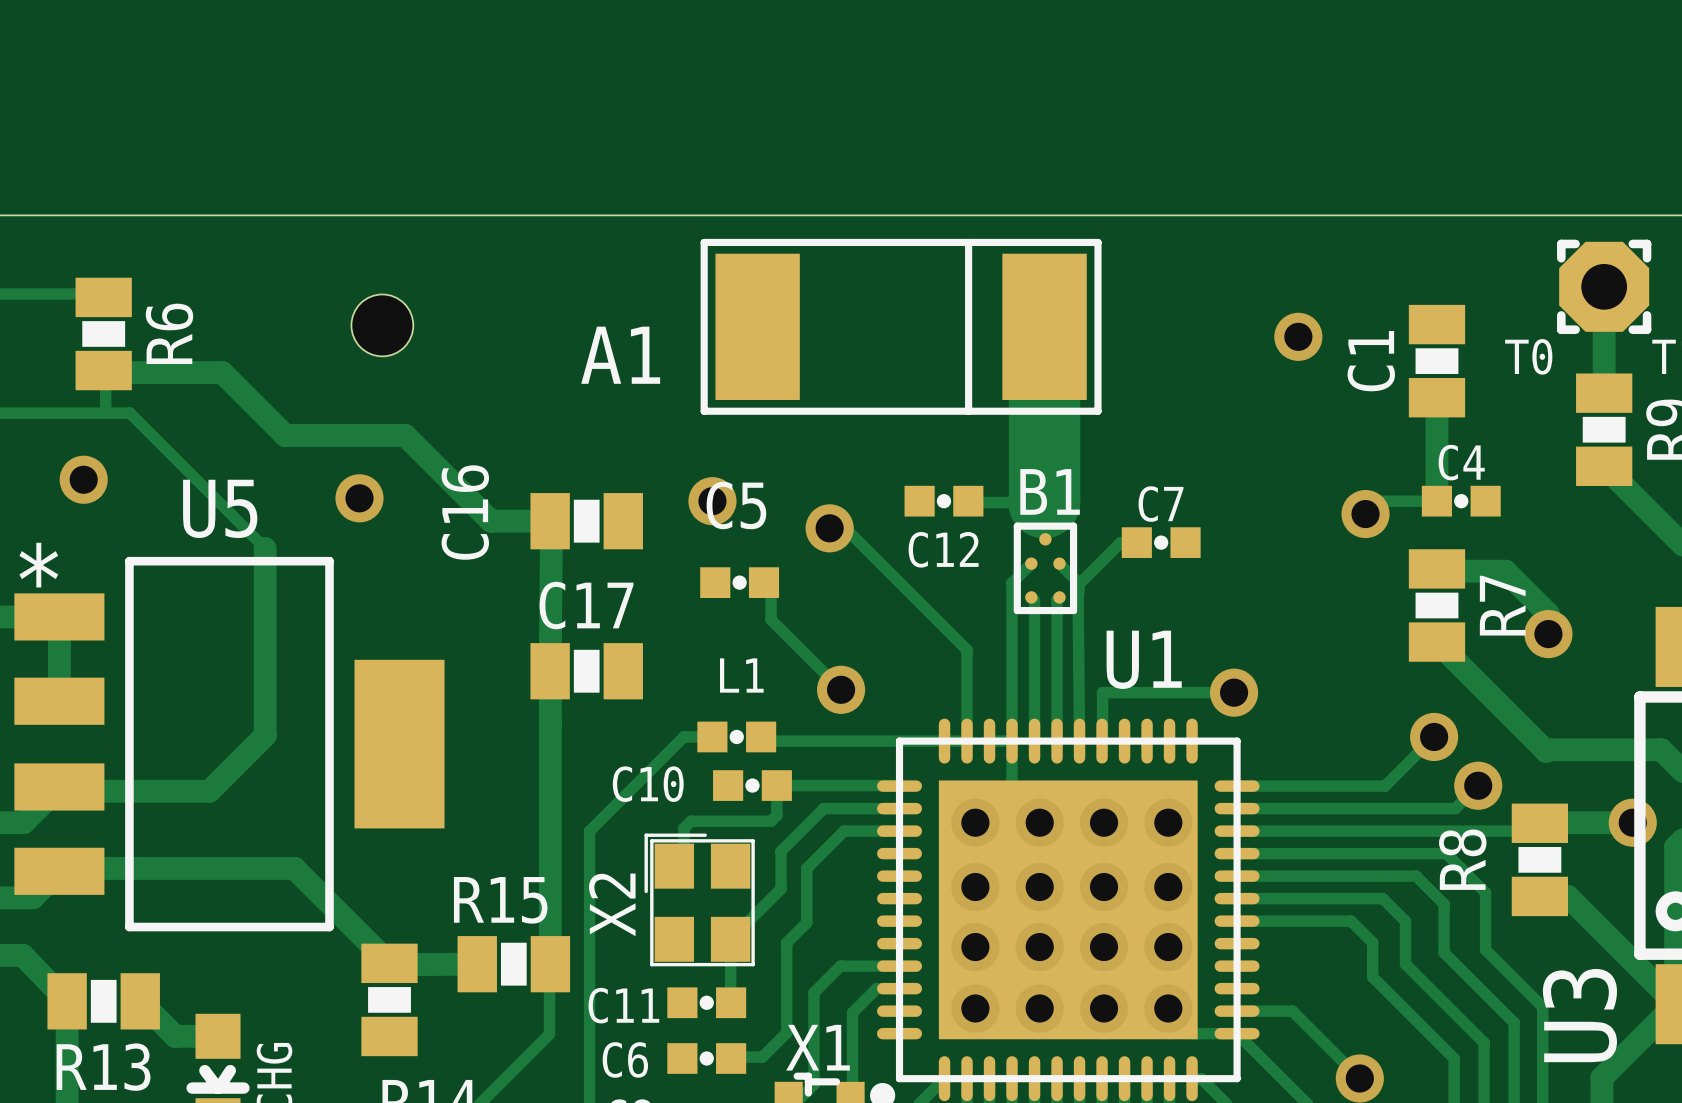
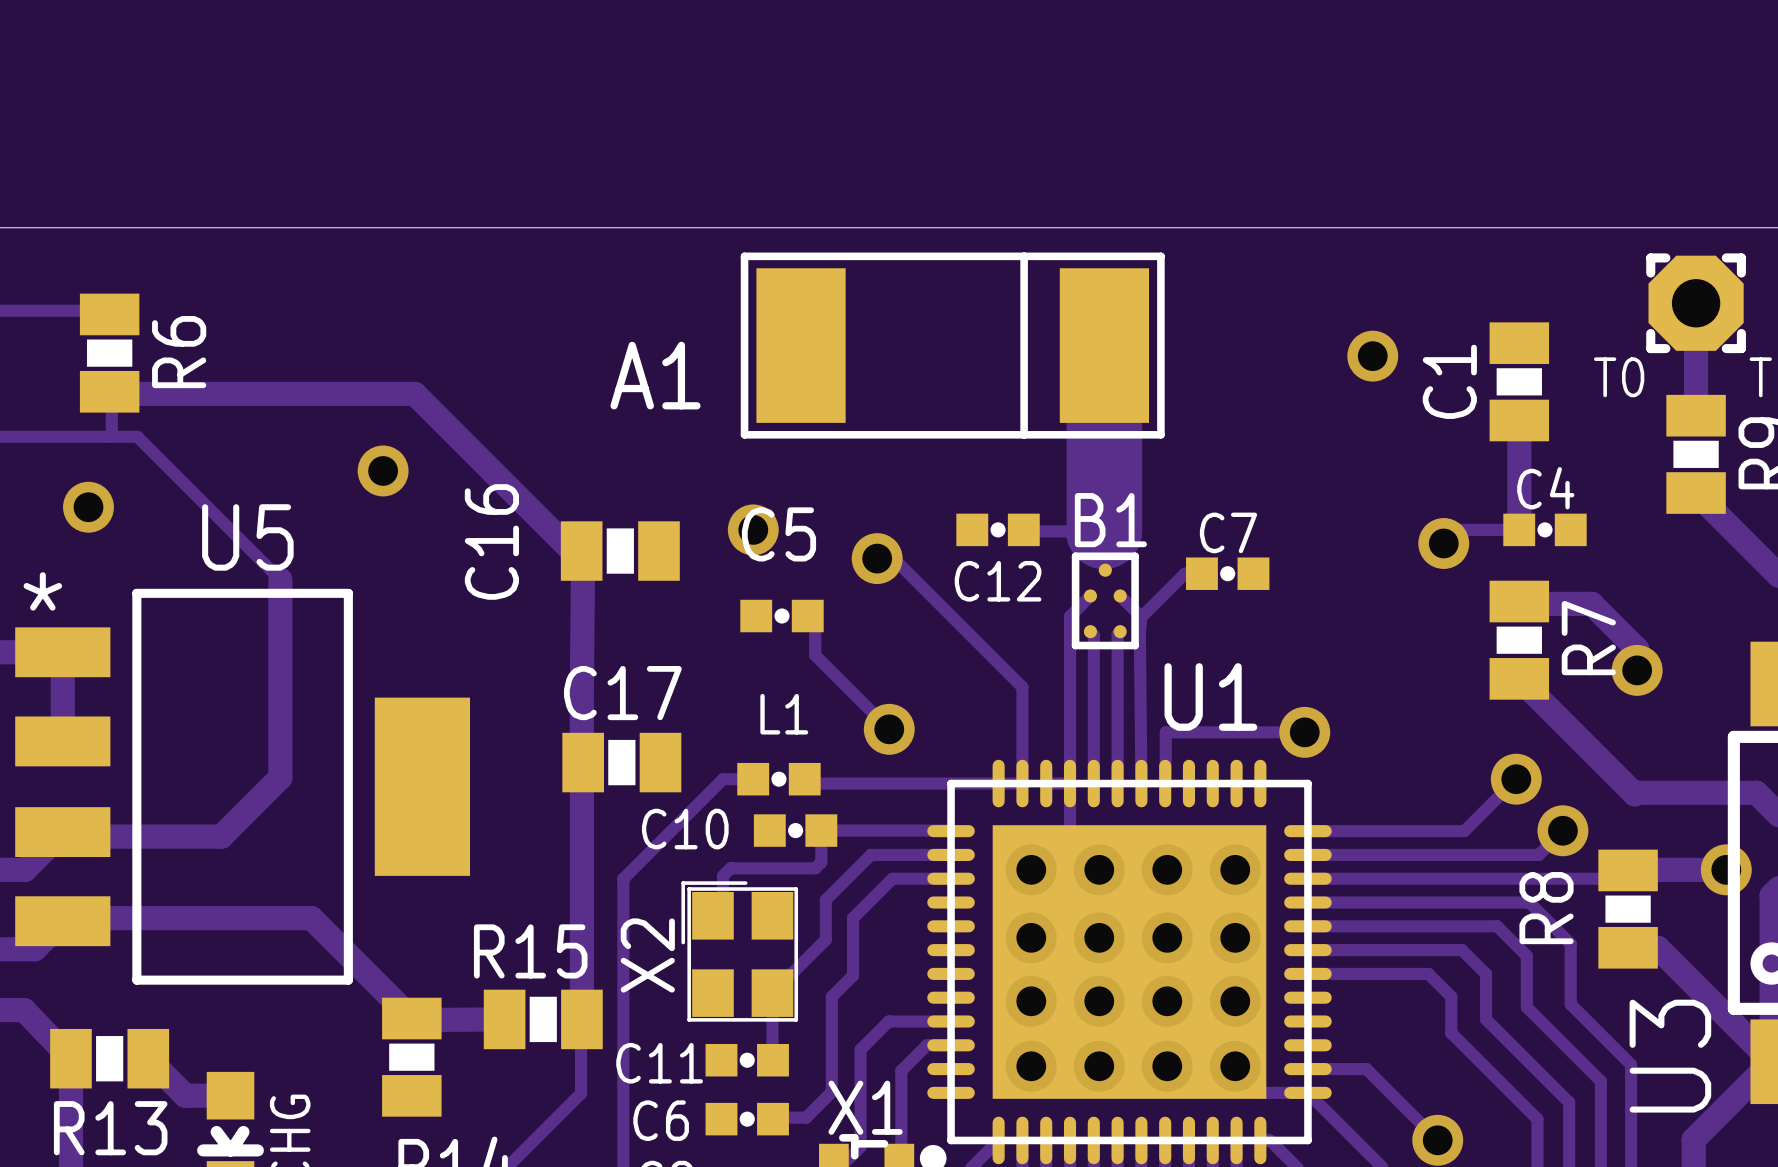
hole: (382, 325) -> none
track: (222, 372) (285, 435) (405, 435) (490, 521) (540, 521) -> (235, 393) (414, 393) (571, 551)
via position: (359, 498) -> (383, 470)
C17 position: (586, 671) -> (621, 762)

